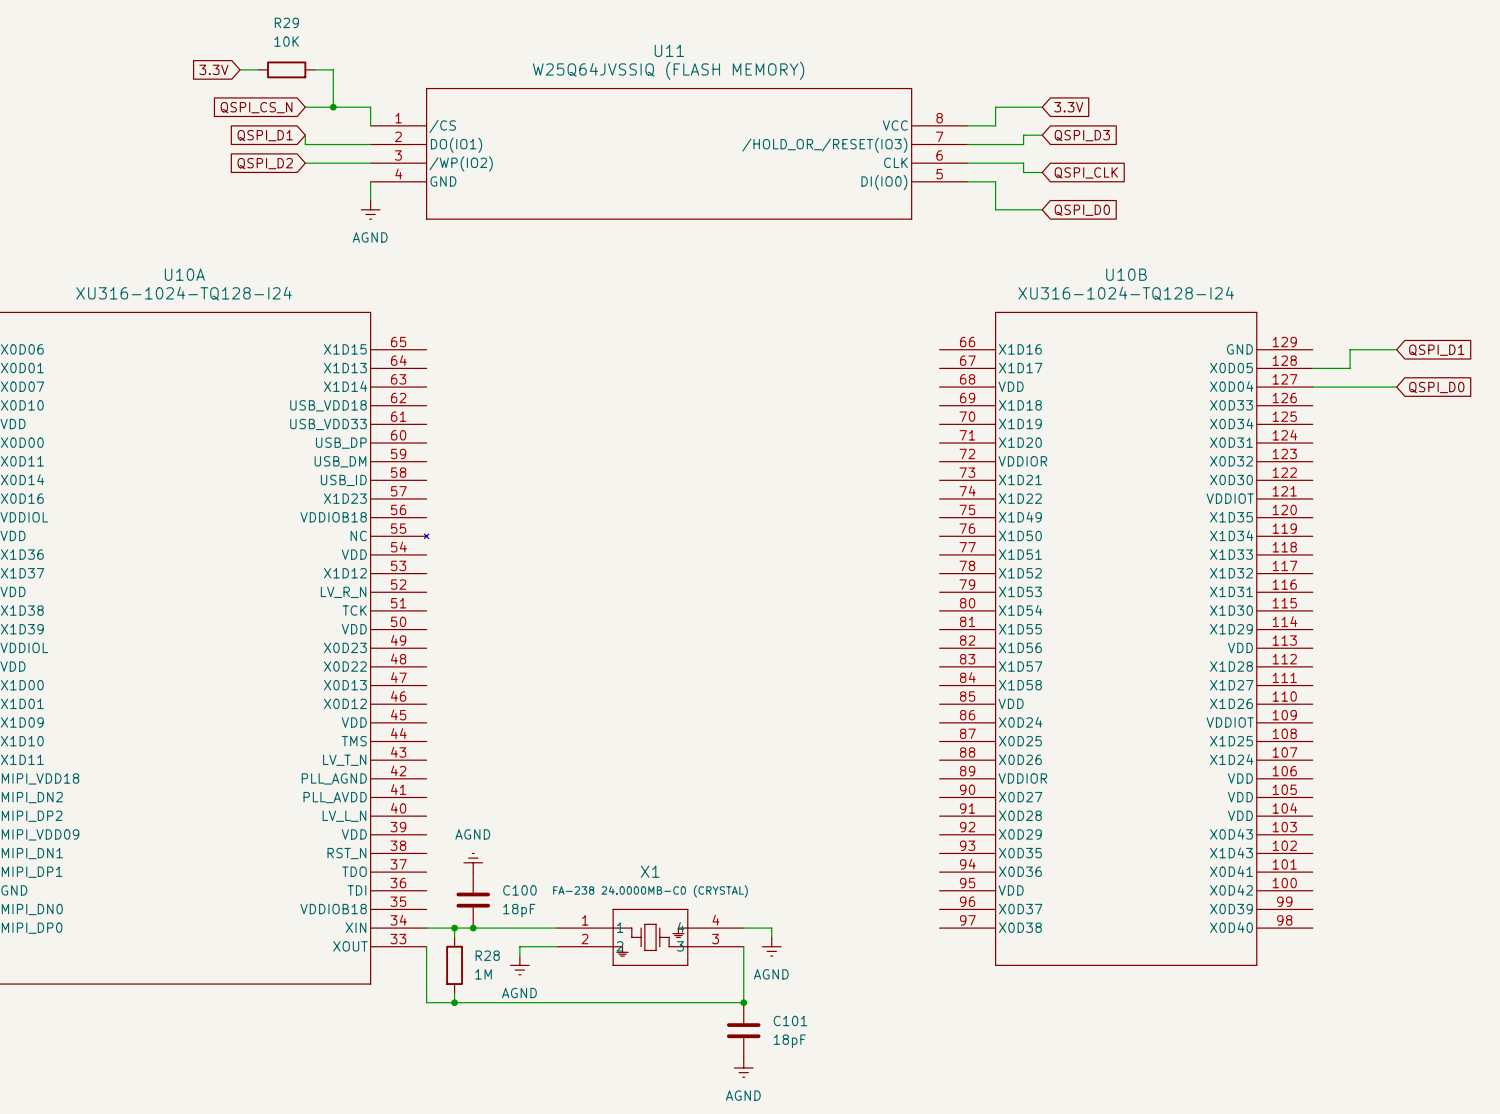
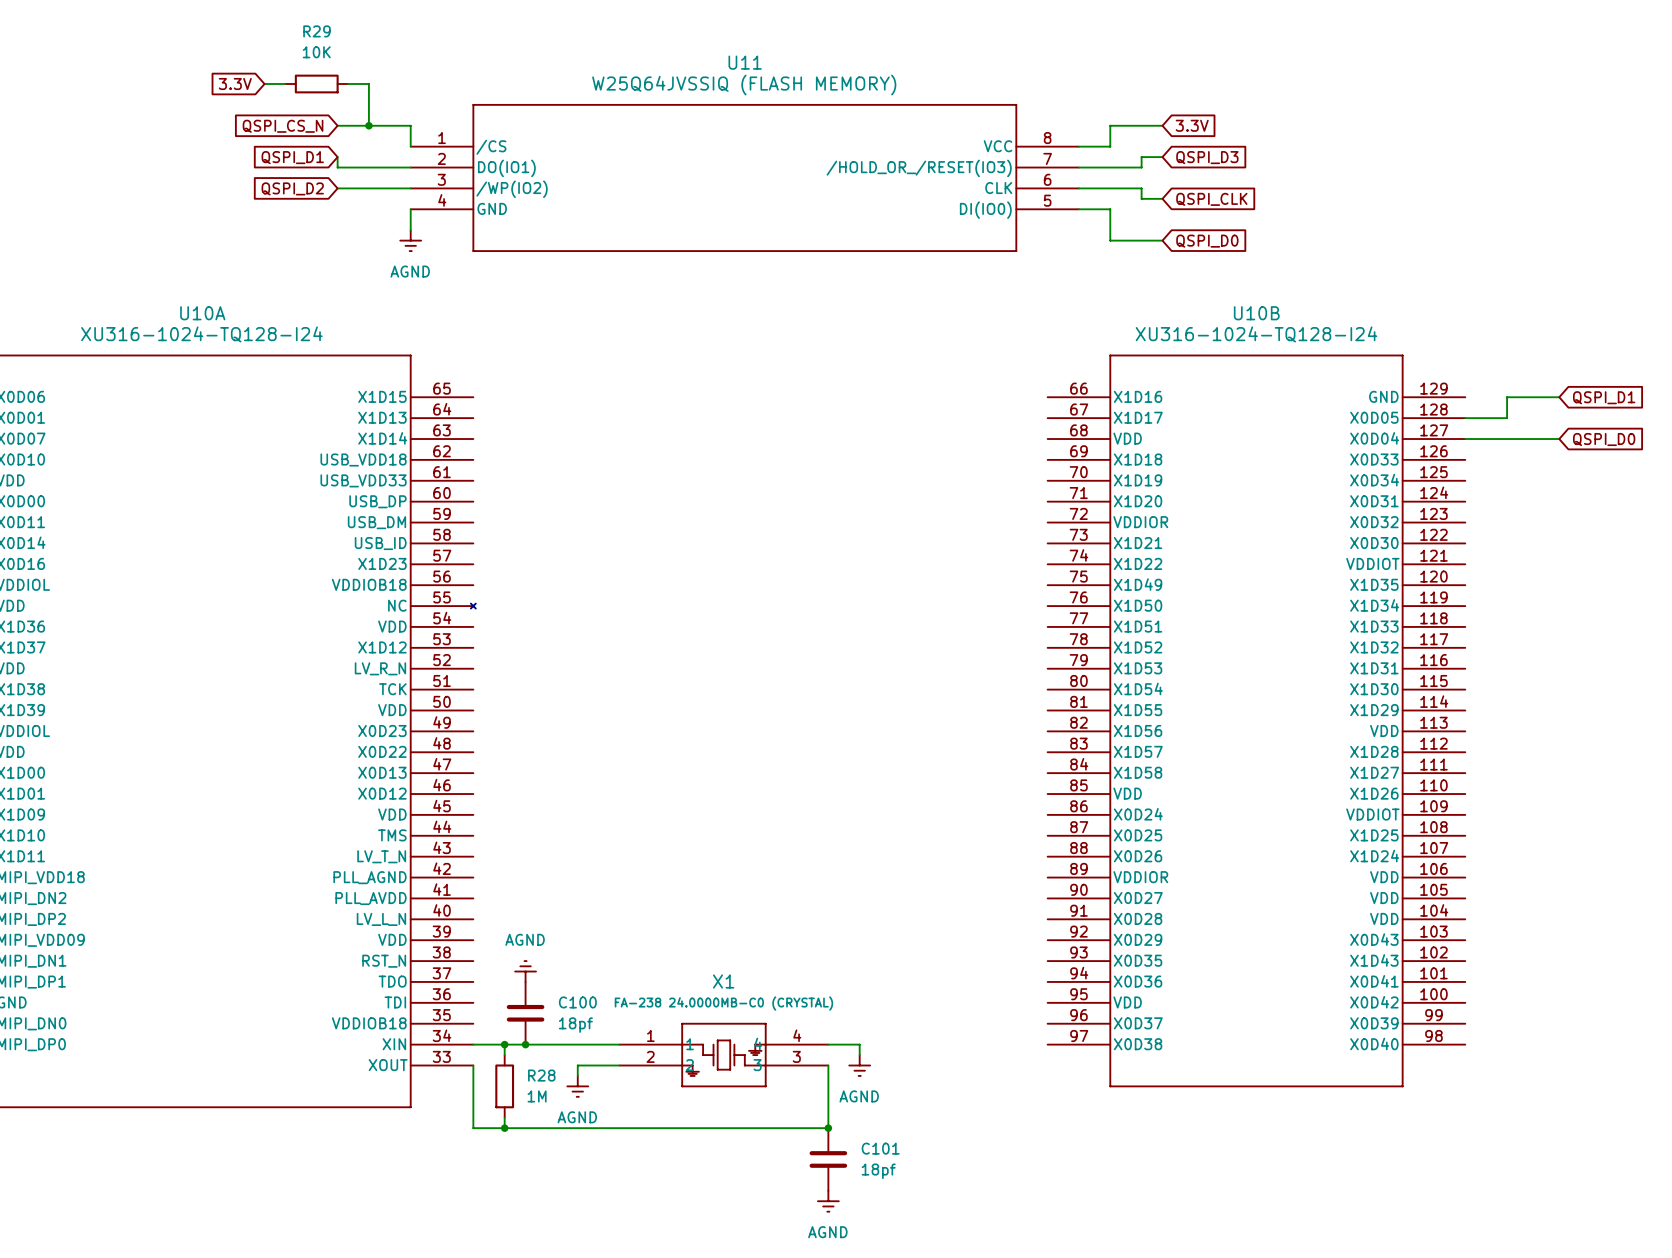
C100 value: 18pF (519, 910) -> 18pf (575, 1025)
C101 value: 18pF (789, 1041) -> 18pf (878, 1171)

